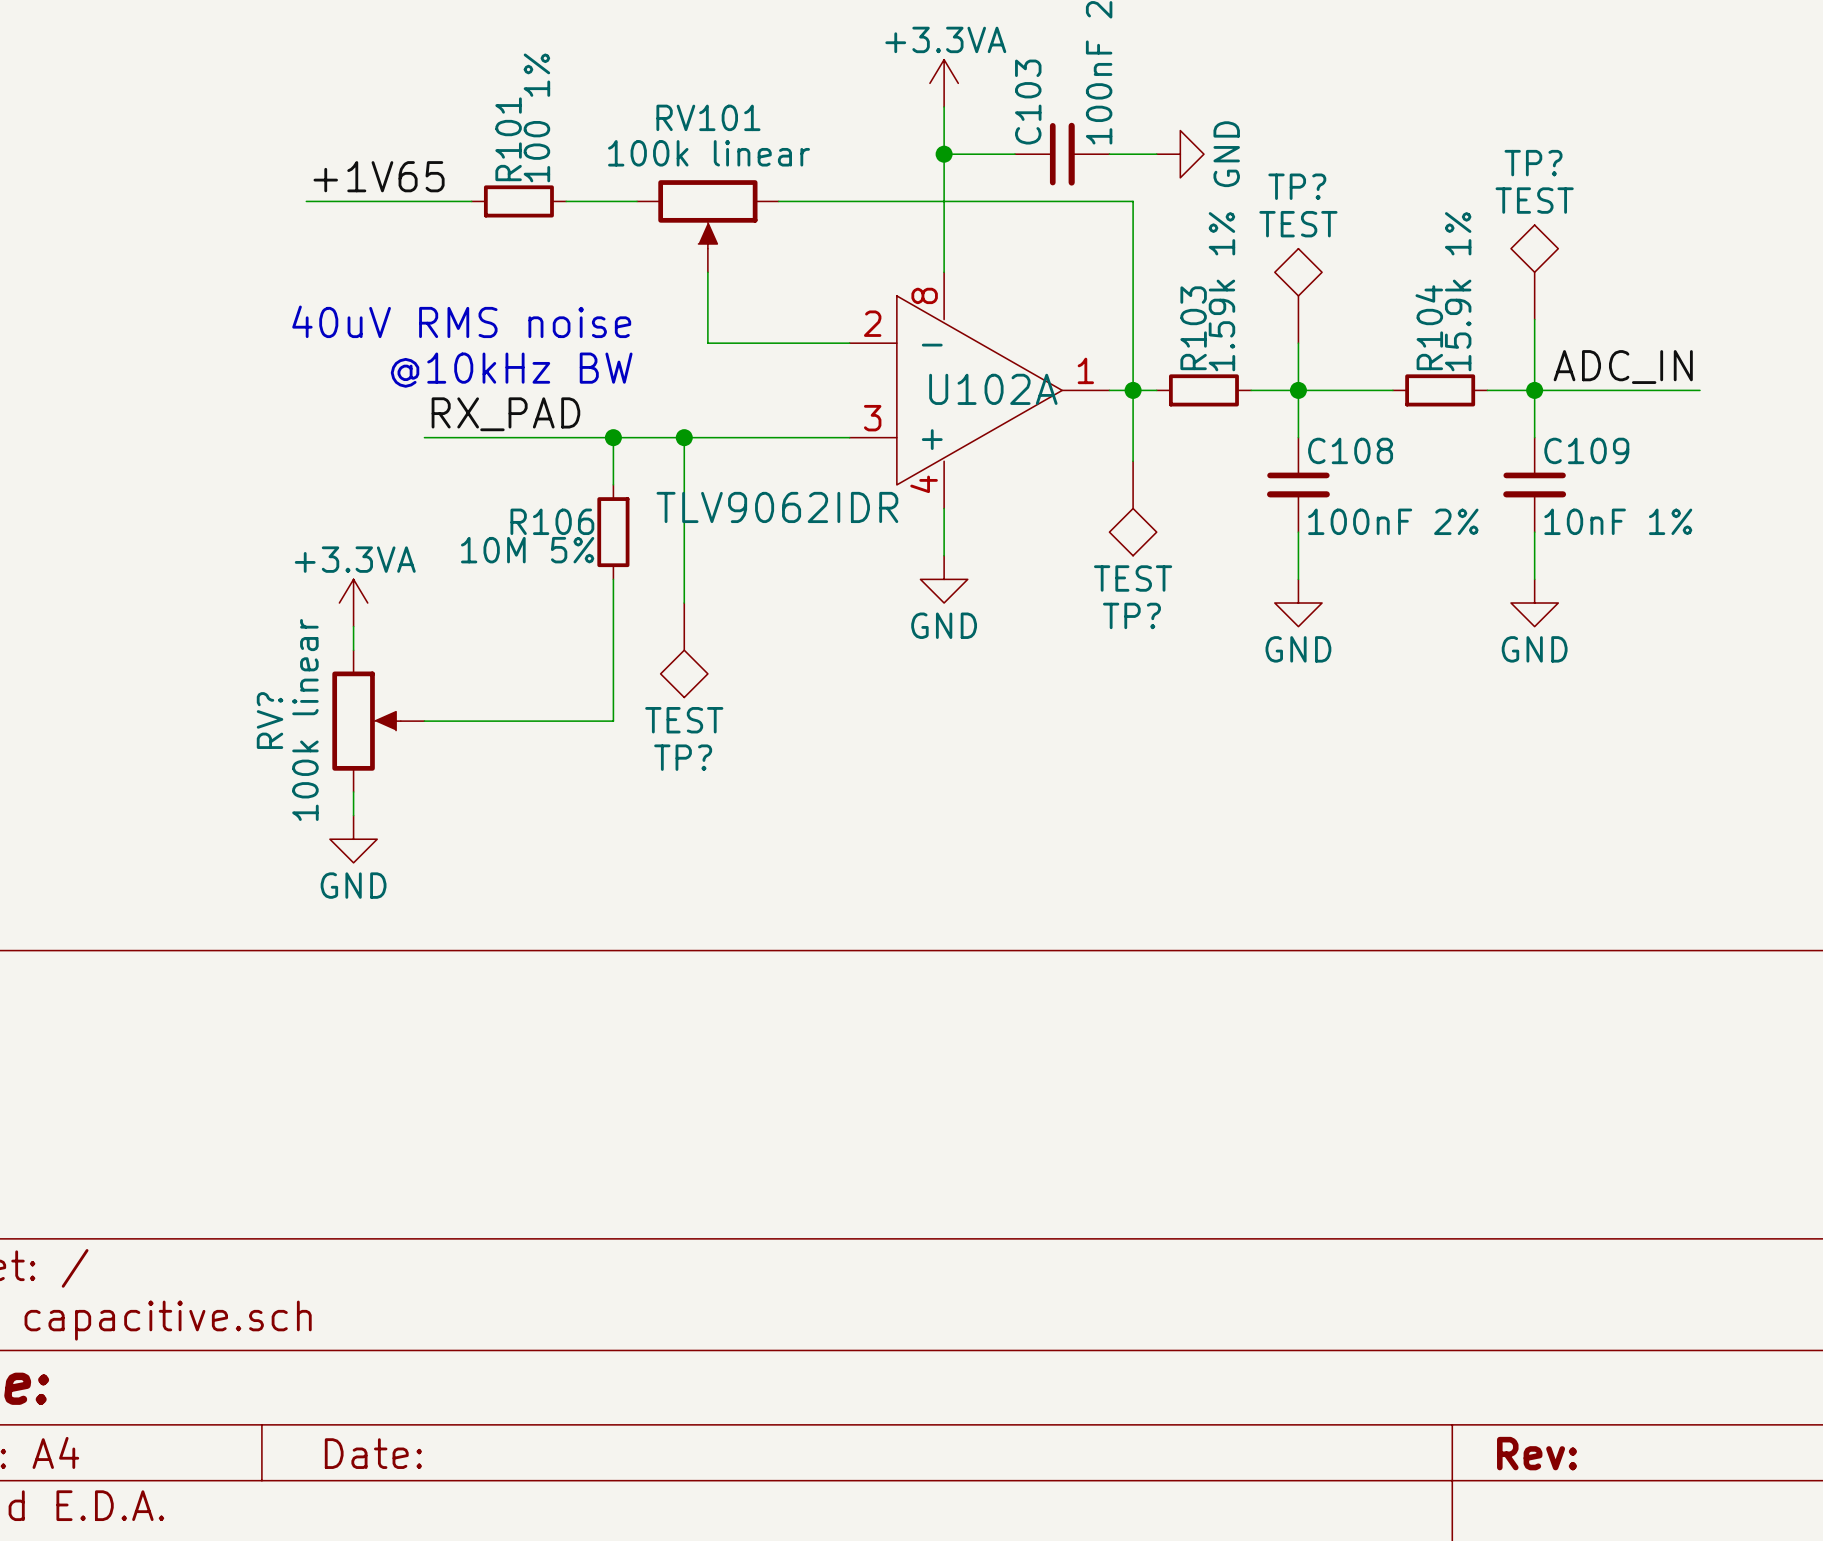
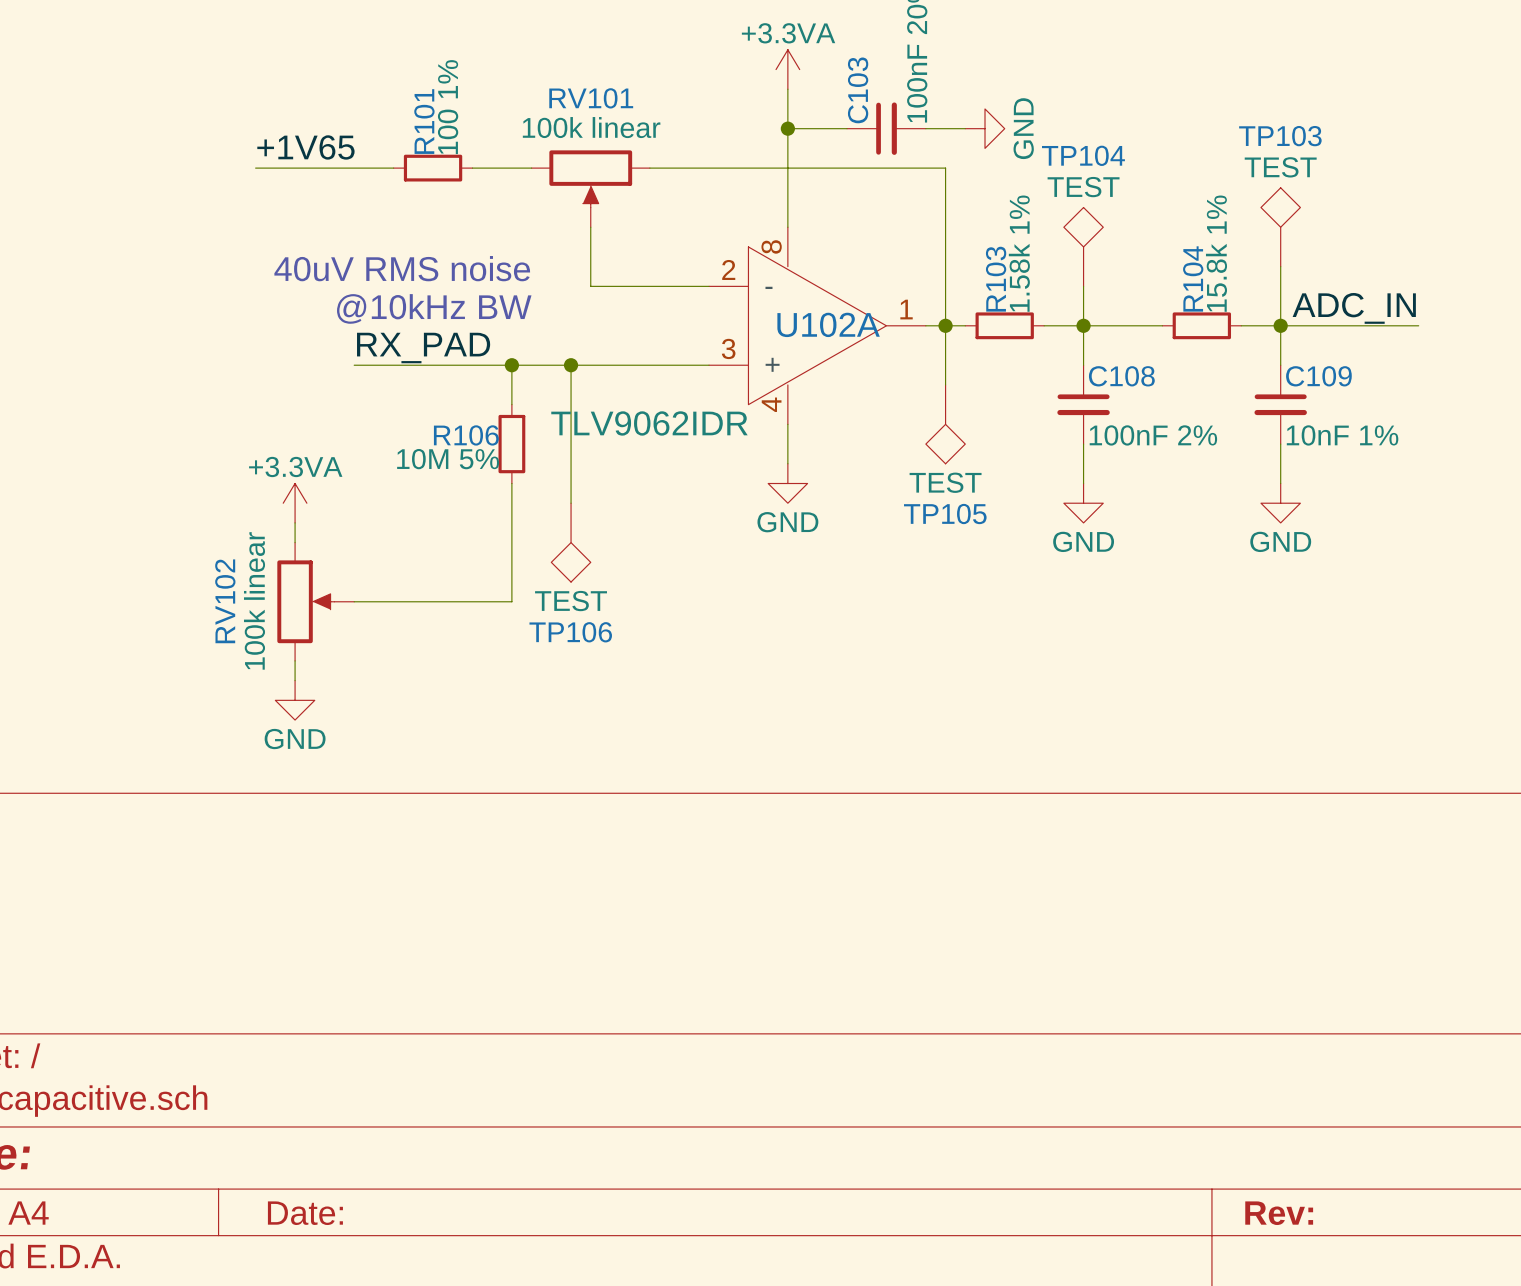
TP? name: TP? (1533, 163) -> TP103 (1280, 136)
TP? name: TP? (1297, 186) -> TP104 (1083, 155)
R103 value: 1.59k 1% (1221, 291) -> 1.58k 1% (1019, 253)
R104 value: 15.9k 1% (1458, 291) -> 15.8k 1% (1216, 253)
TP? name: TP? (1131, 615) -> TP105 (945, 514)
RV? name: RV? (270, 720) -> RV102 (225, 601)
TP? name: TP? (683, 757) -> TP106 (570, 632)

